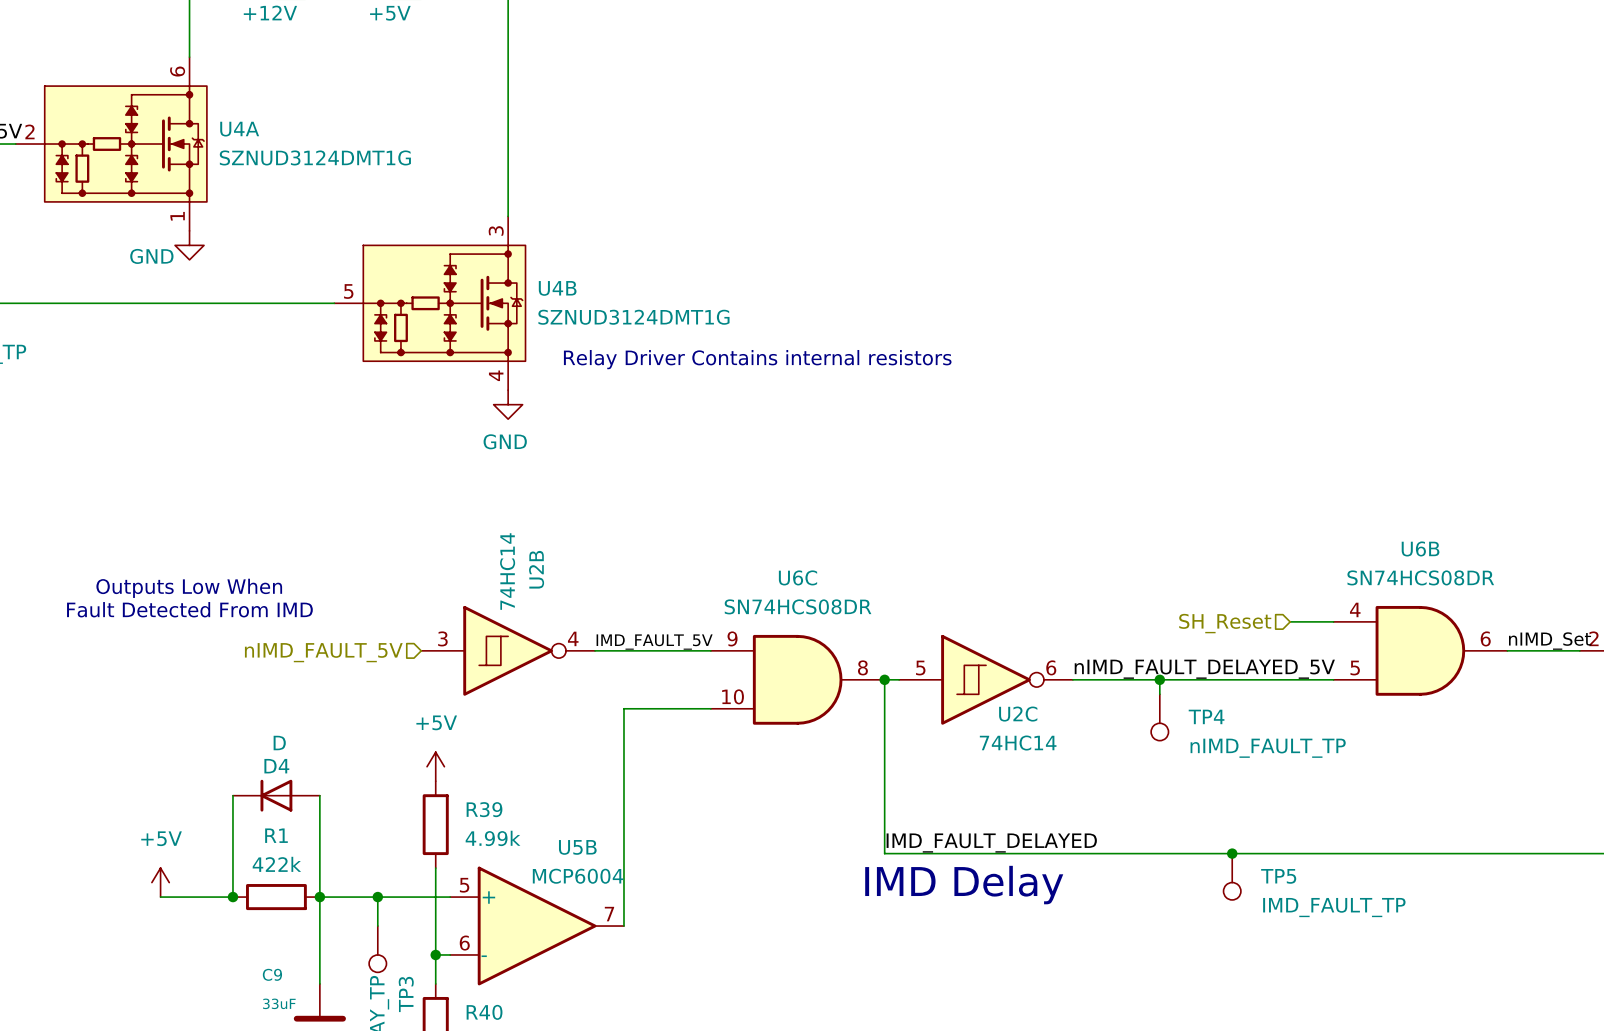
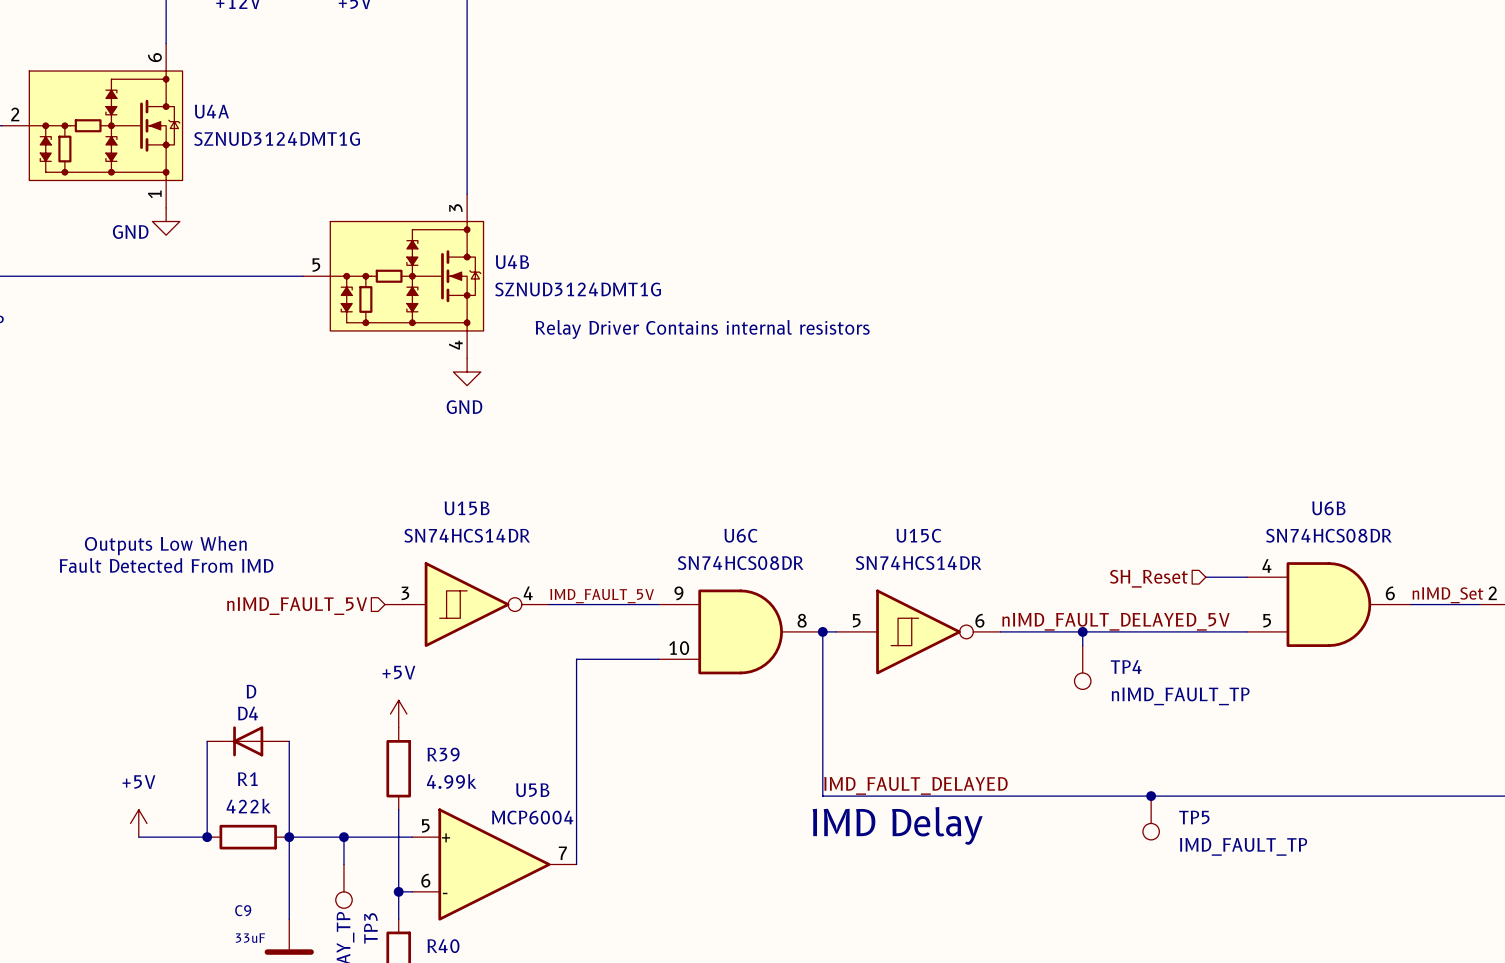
U2B name: U2B (536, 569) -> U15B (467, 508)
U2B value: 74HC14 (507, 571) -> SN74HCS14DR (467, 535)
U2C name: U2C (1018, 714) -> U15C (918, 535)
U2C value: 74HC14 (1018, 743) -> SN74HCS14DR (918, 563)

